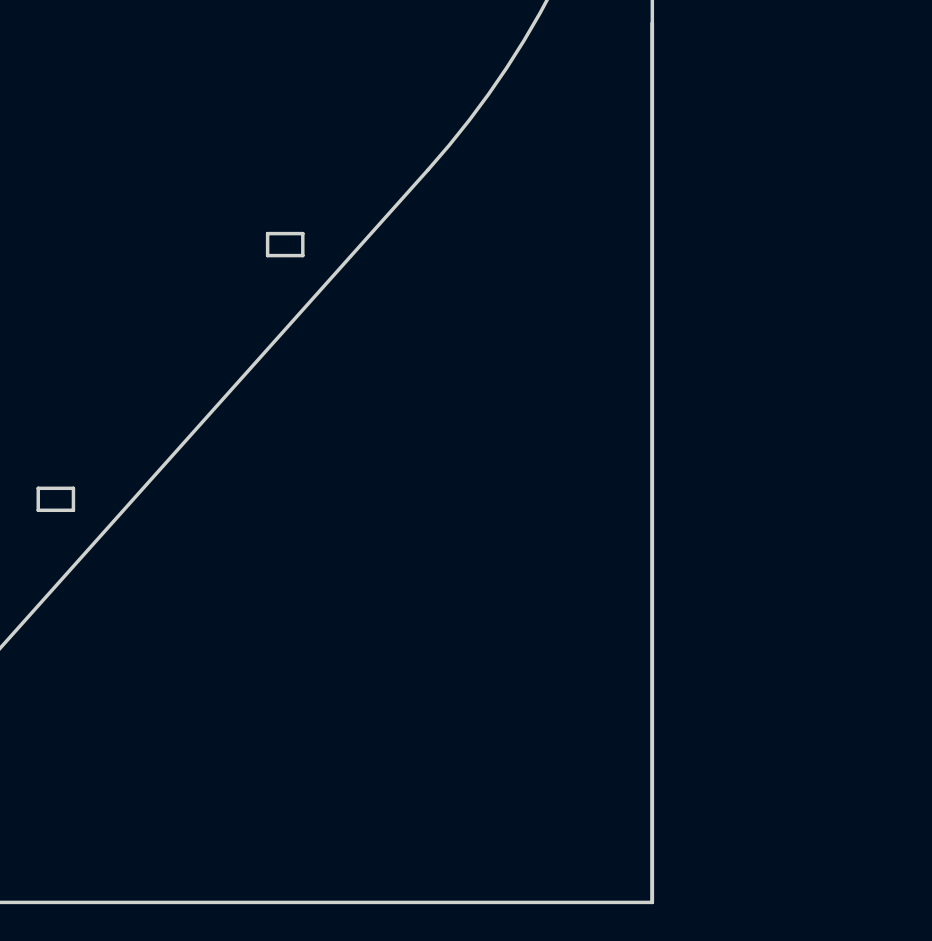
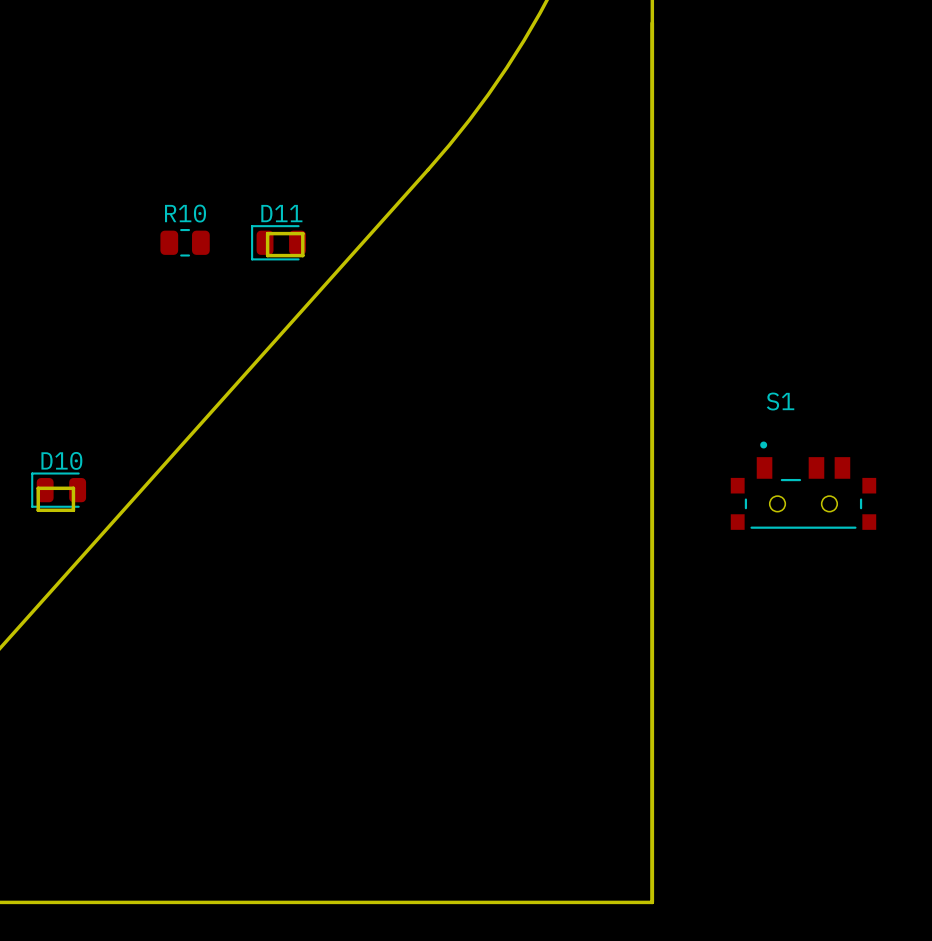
R10: none -> (185, 242)
D11: none -> (278, 242)
S1: none -> (803, 485)
D10: none -> (58, 490)

